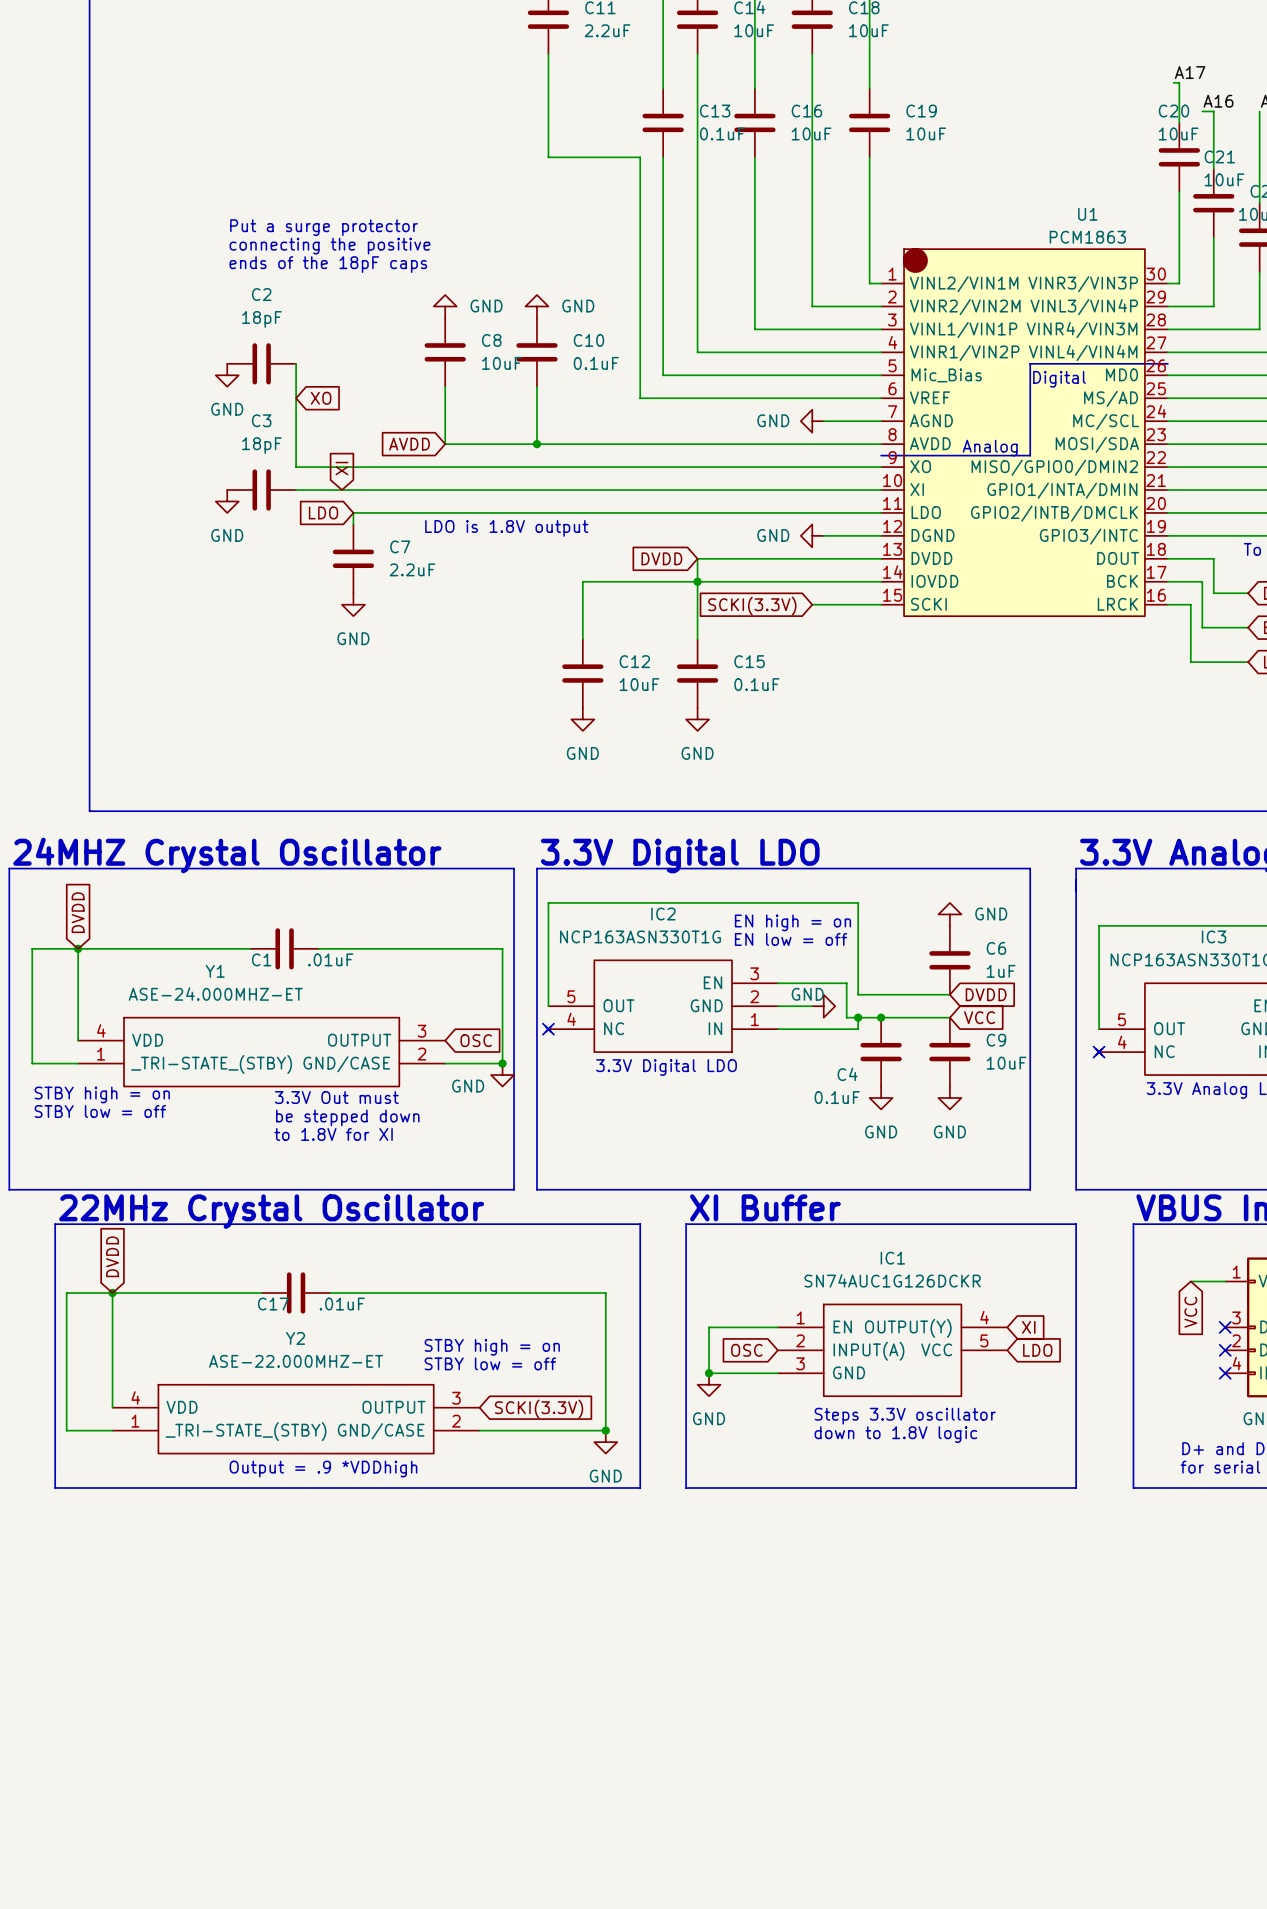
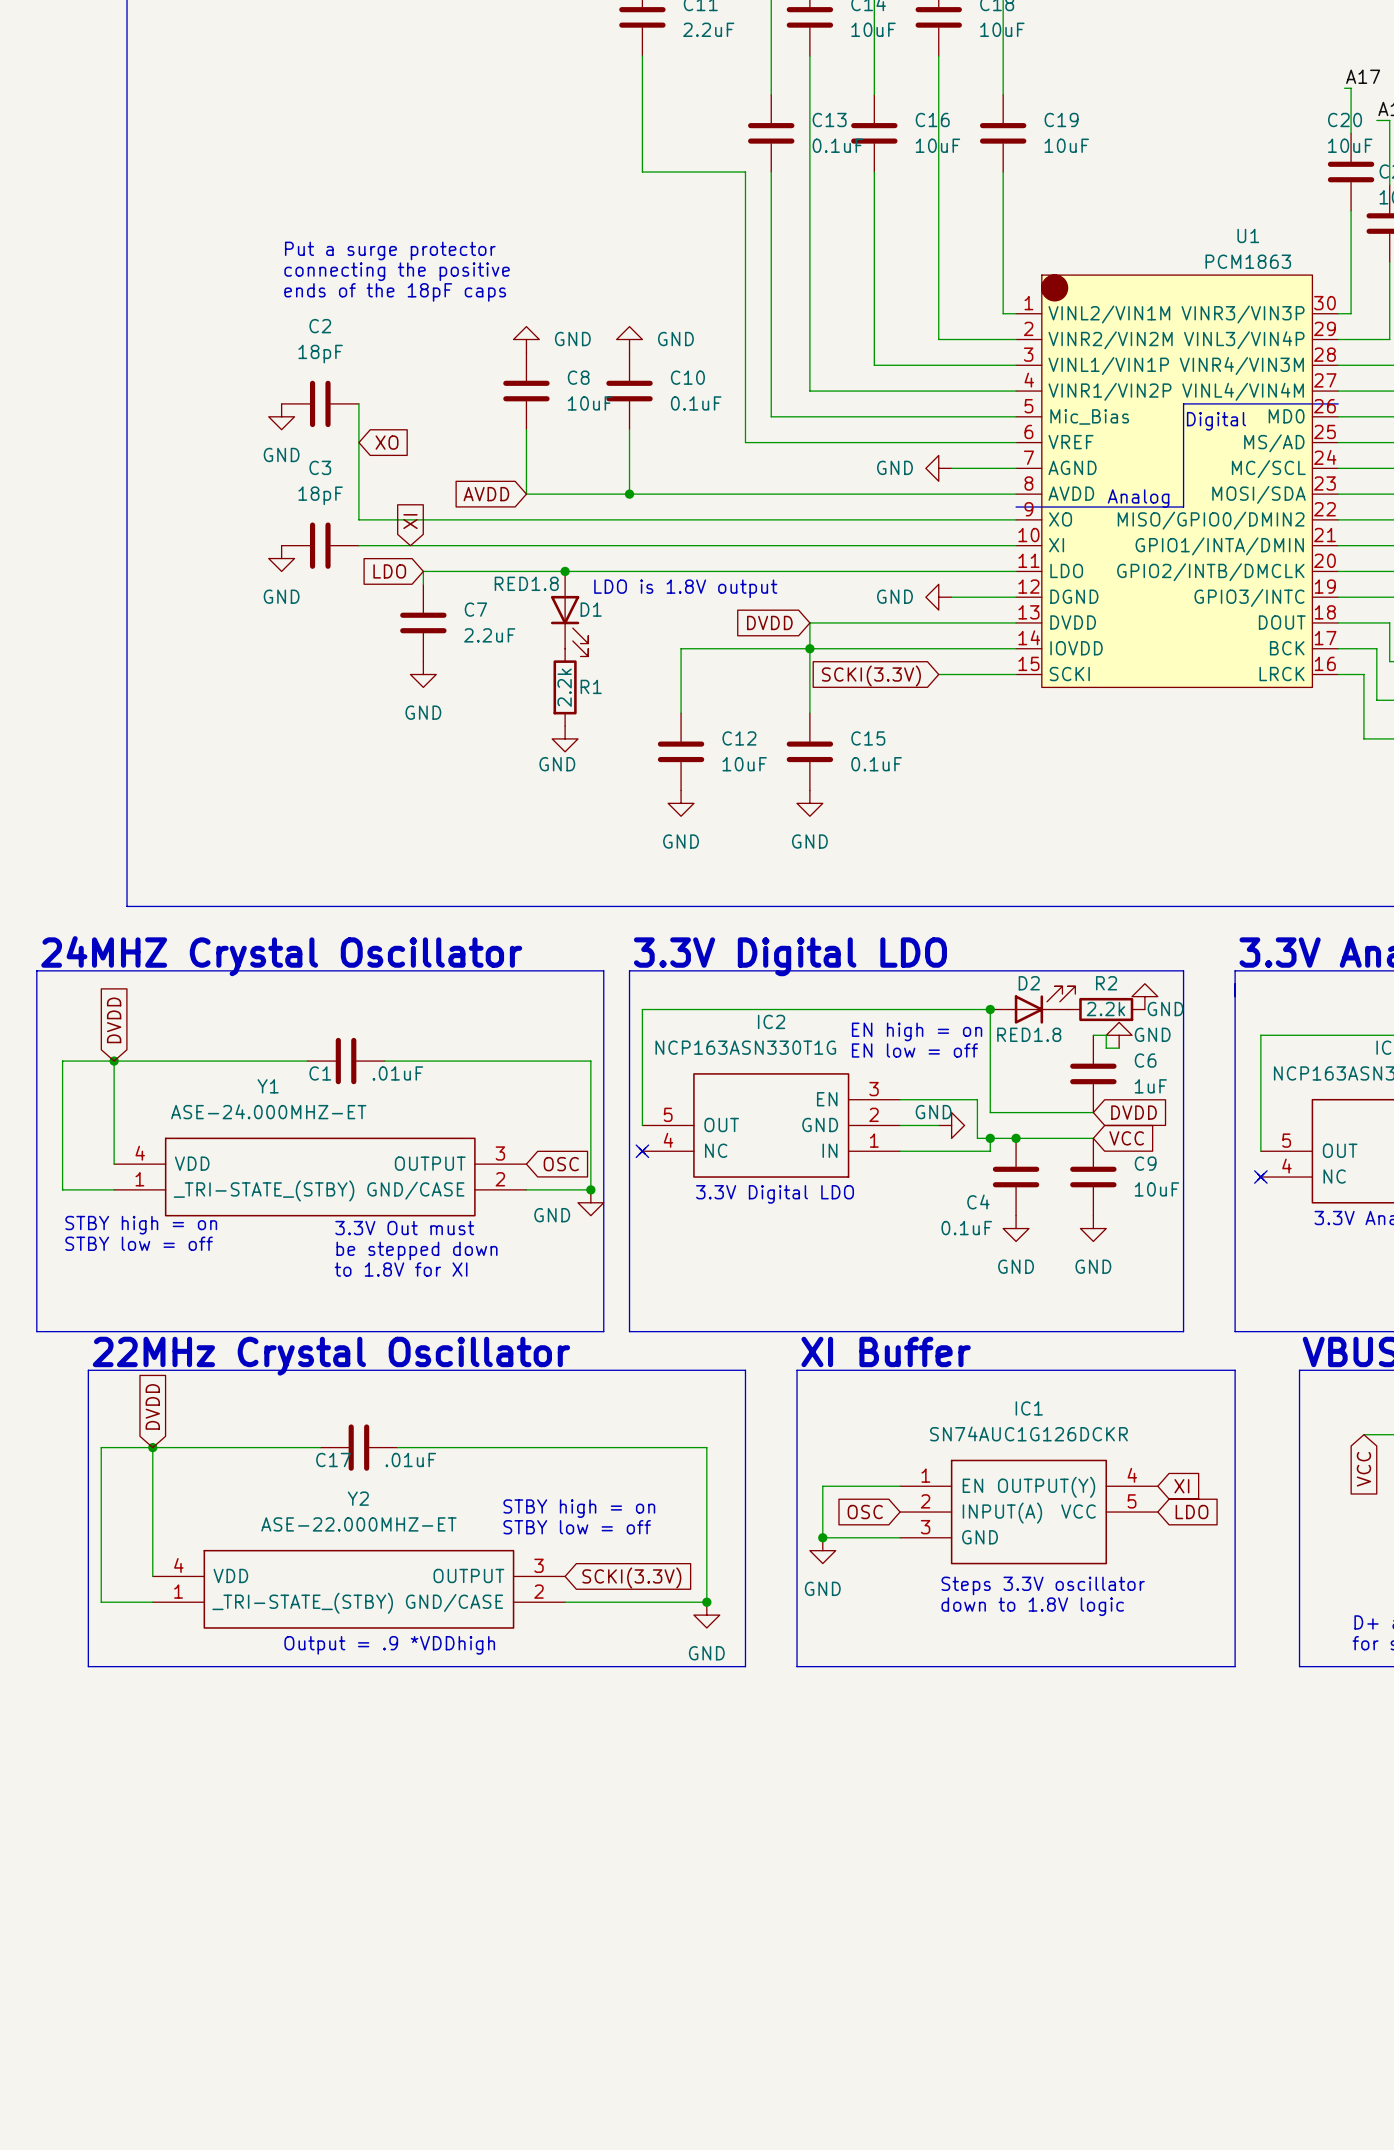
junction: none -> (565, 571)
text position: LDO is 1.8V output (506, 528) -> LDO is 1.8V output (685, 588)
D1: none -> RED1.8 (569, 613)
R1: none -> 2.2k (565, 687)
power symbol: none -> GND (565, 738)
power symbol: none -> GND (1144, 996)
D2: none -> RED1.8 (1032, 1005)
junction: none -> (990, 1009)
R2: none -> 2.2k (1106, 1009)
power symbol: GND (949, 914) -> none
wire: none -> (1093, 1035) (1106, 1035) (1106, 1048) (1119, 1048)
power symbol: none -> GND (1119, 1035)

